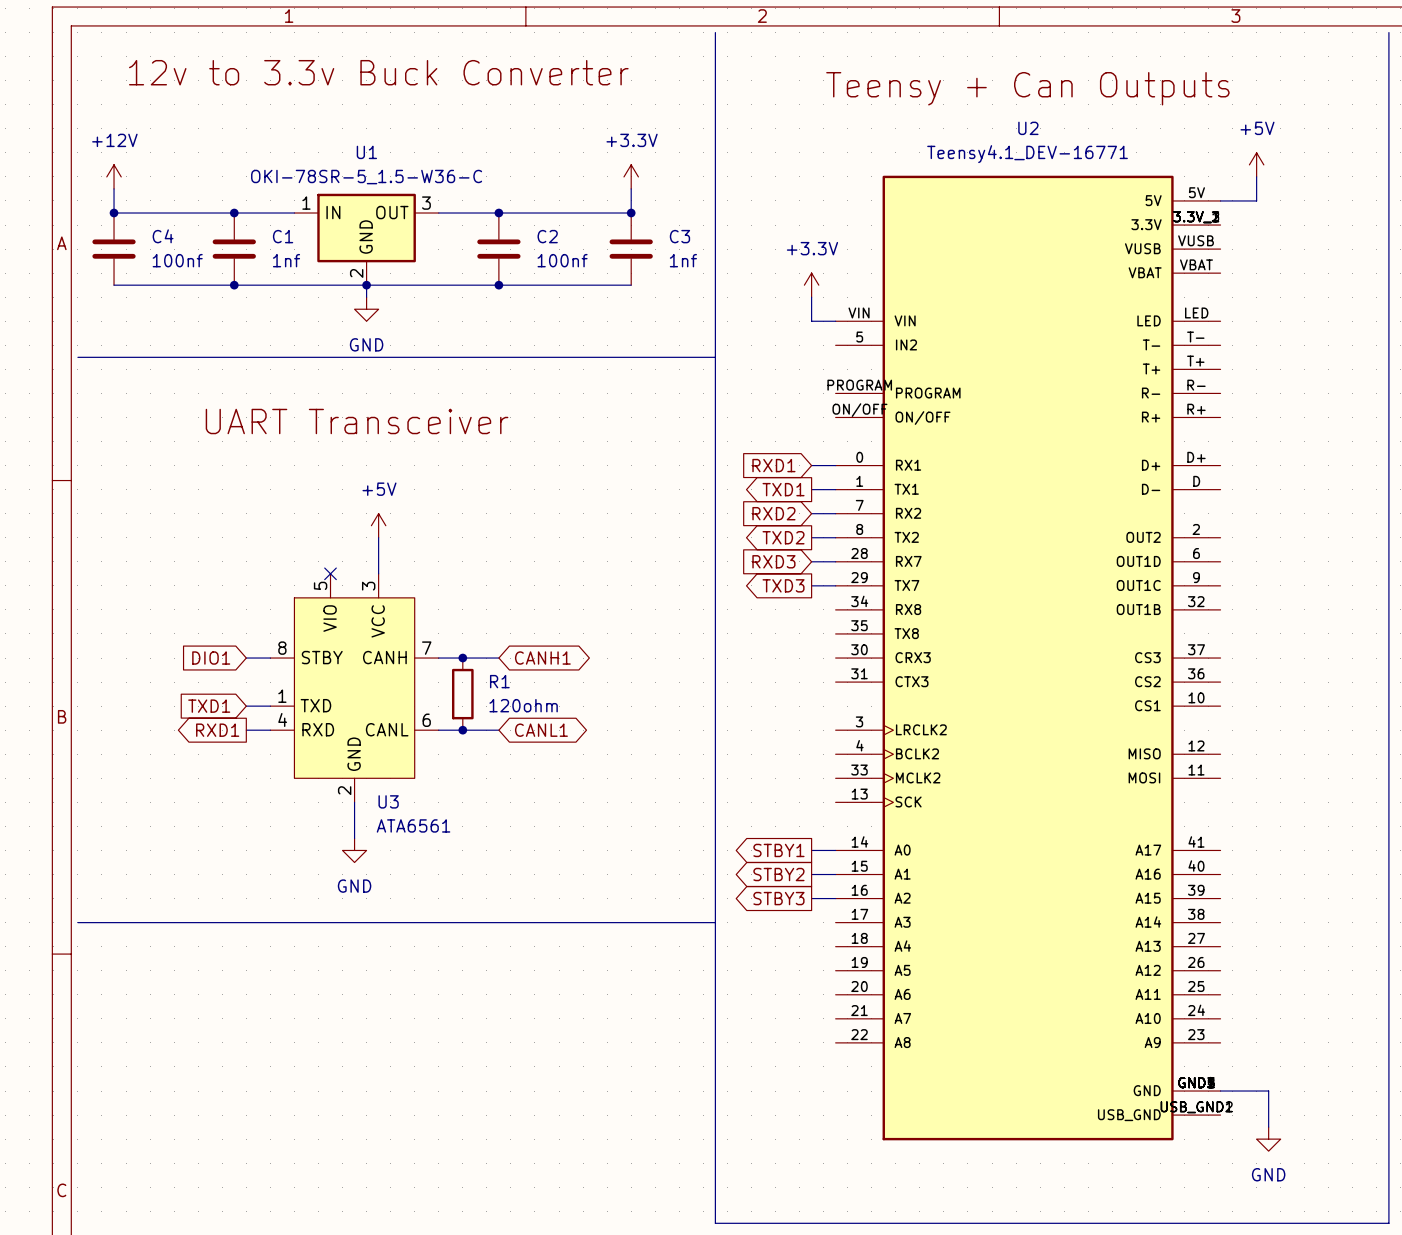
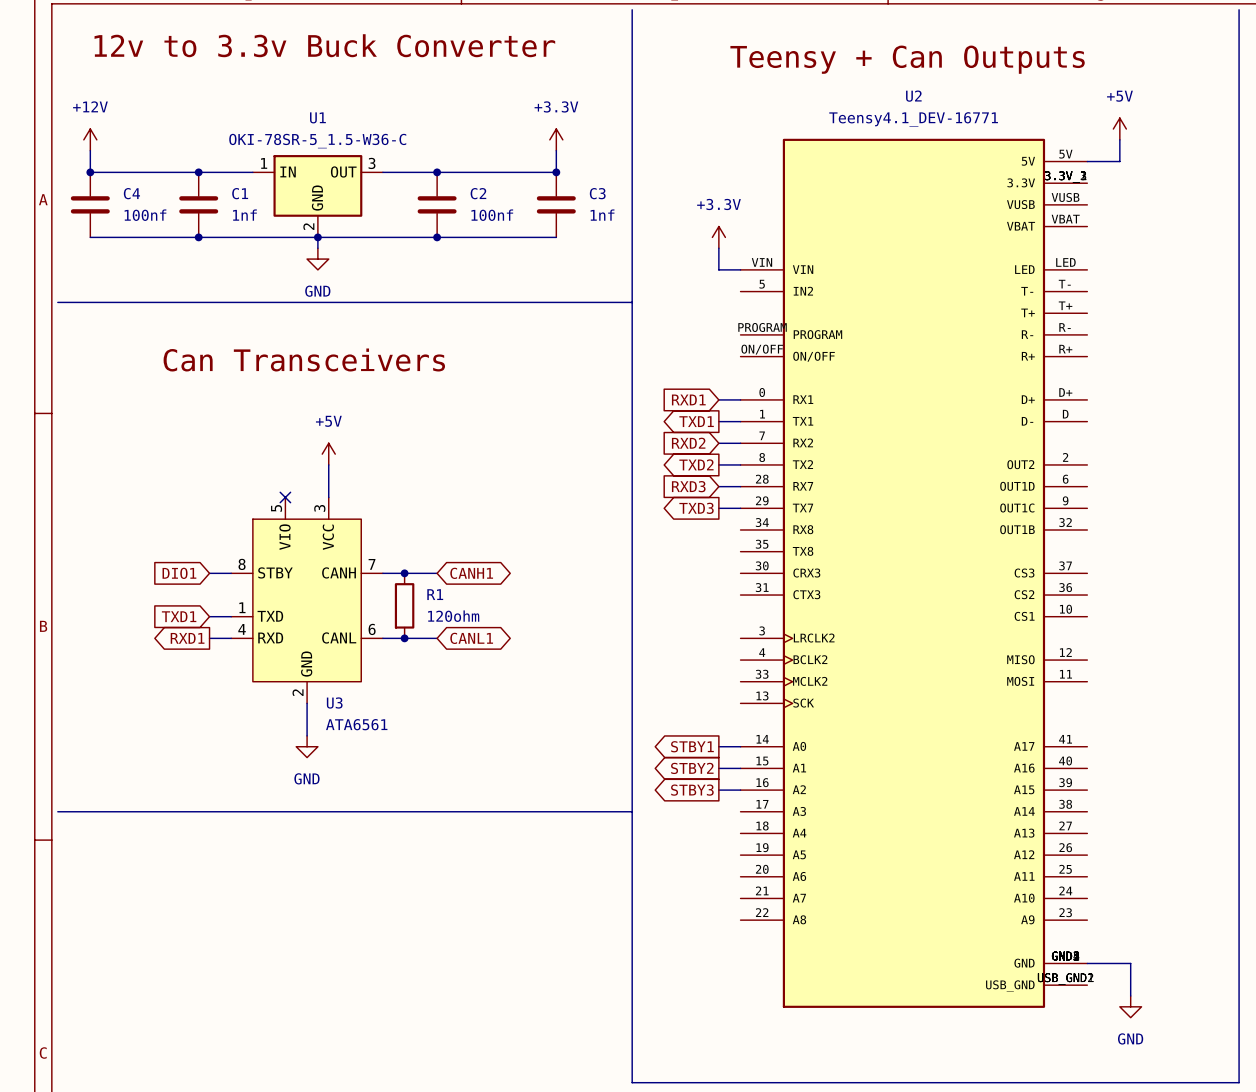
label: UART Transceiver (357, 421) -> Can Transceivers (304, 359)

